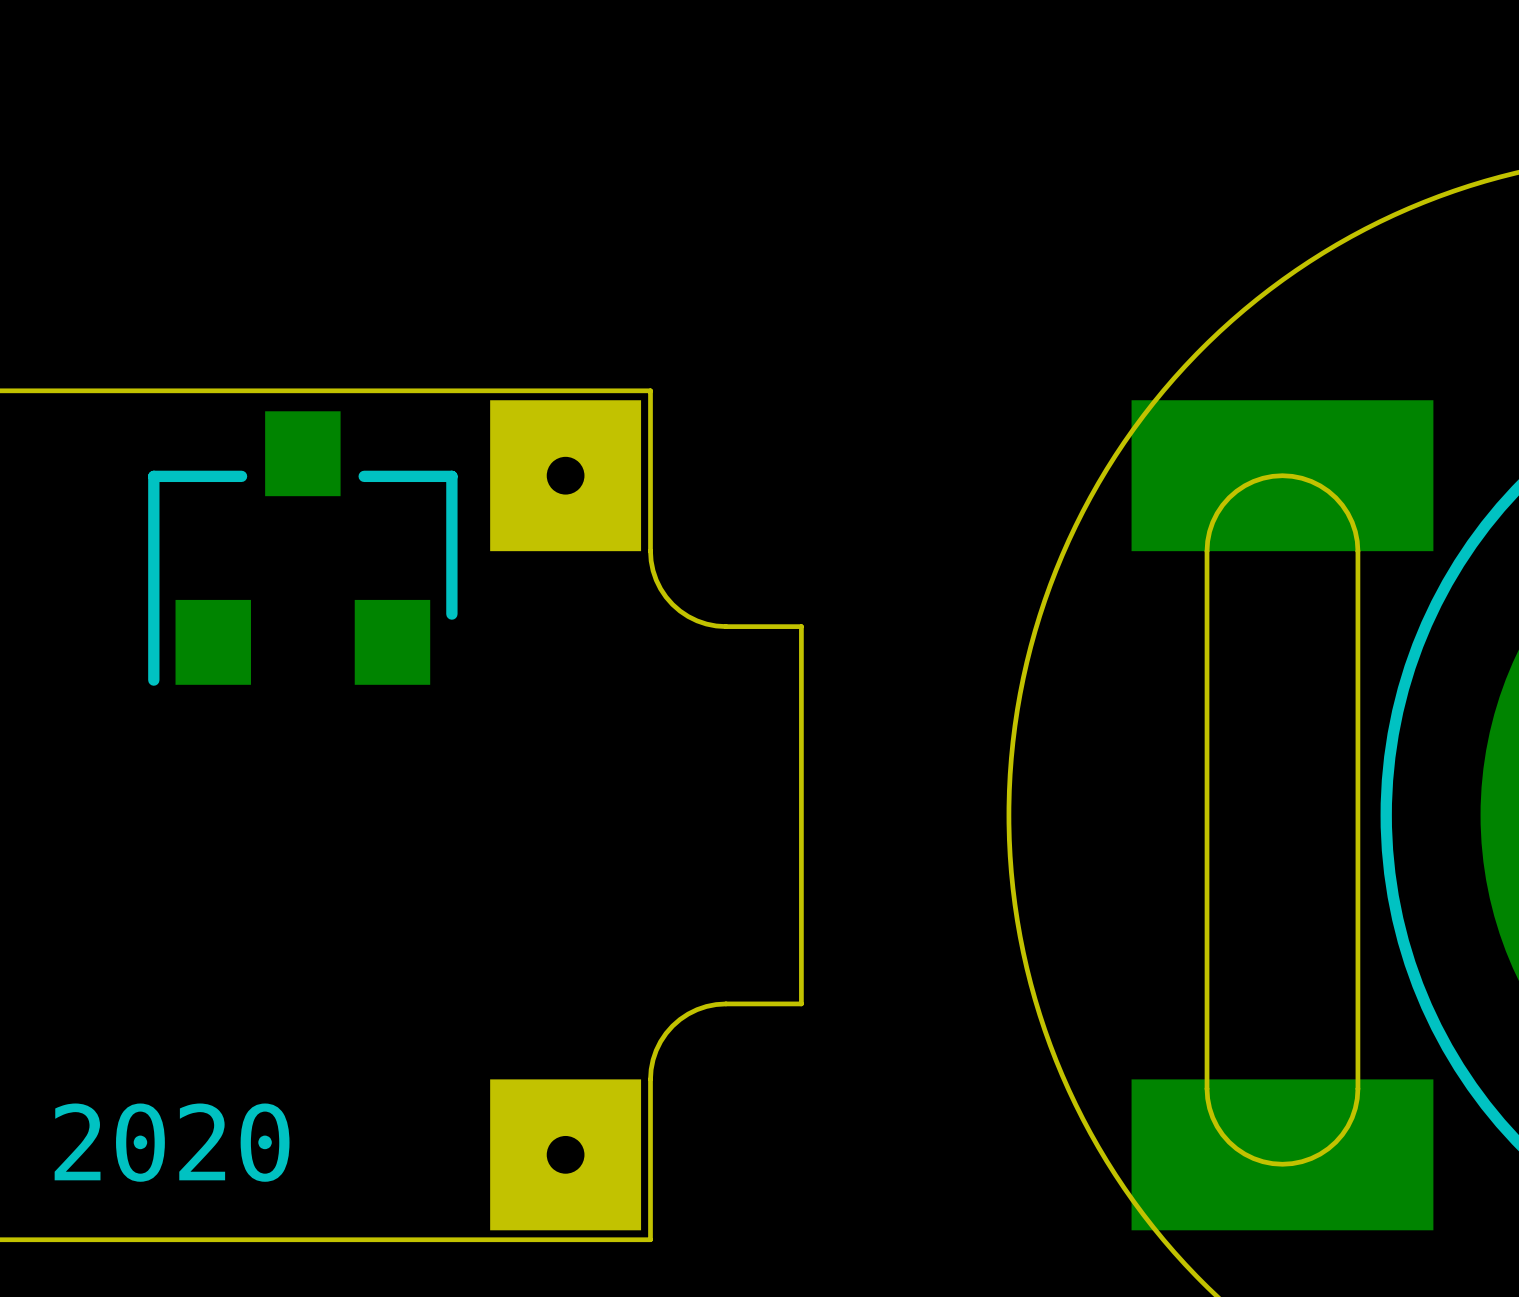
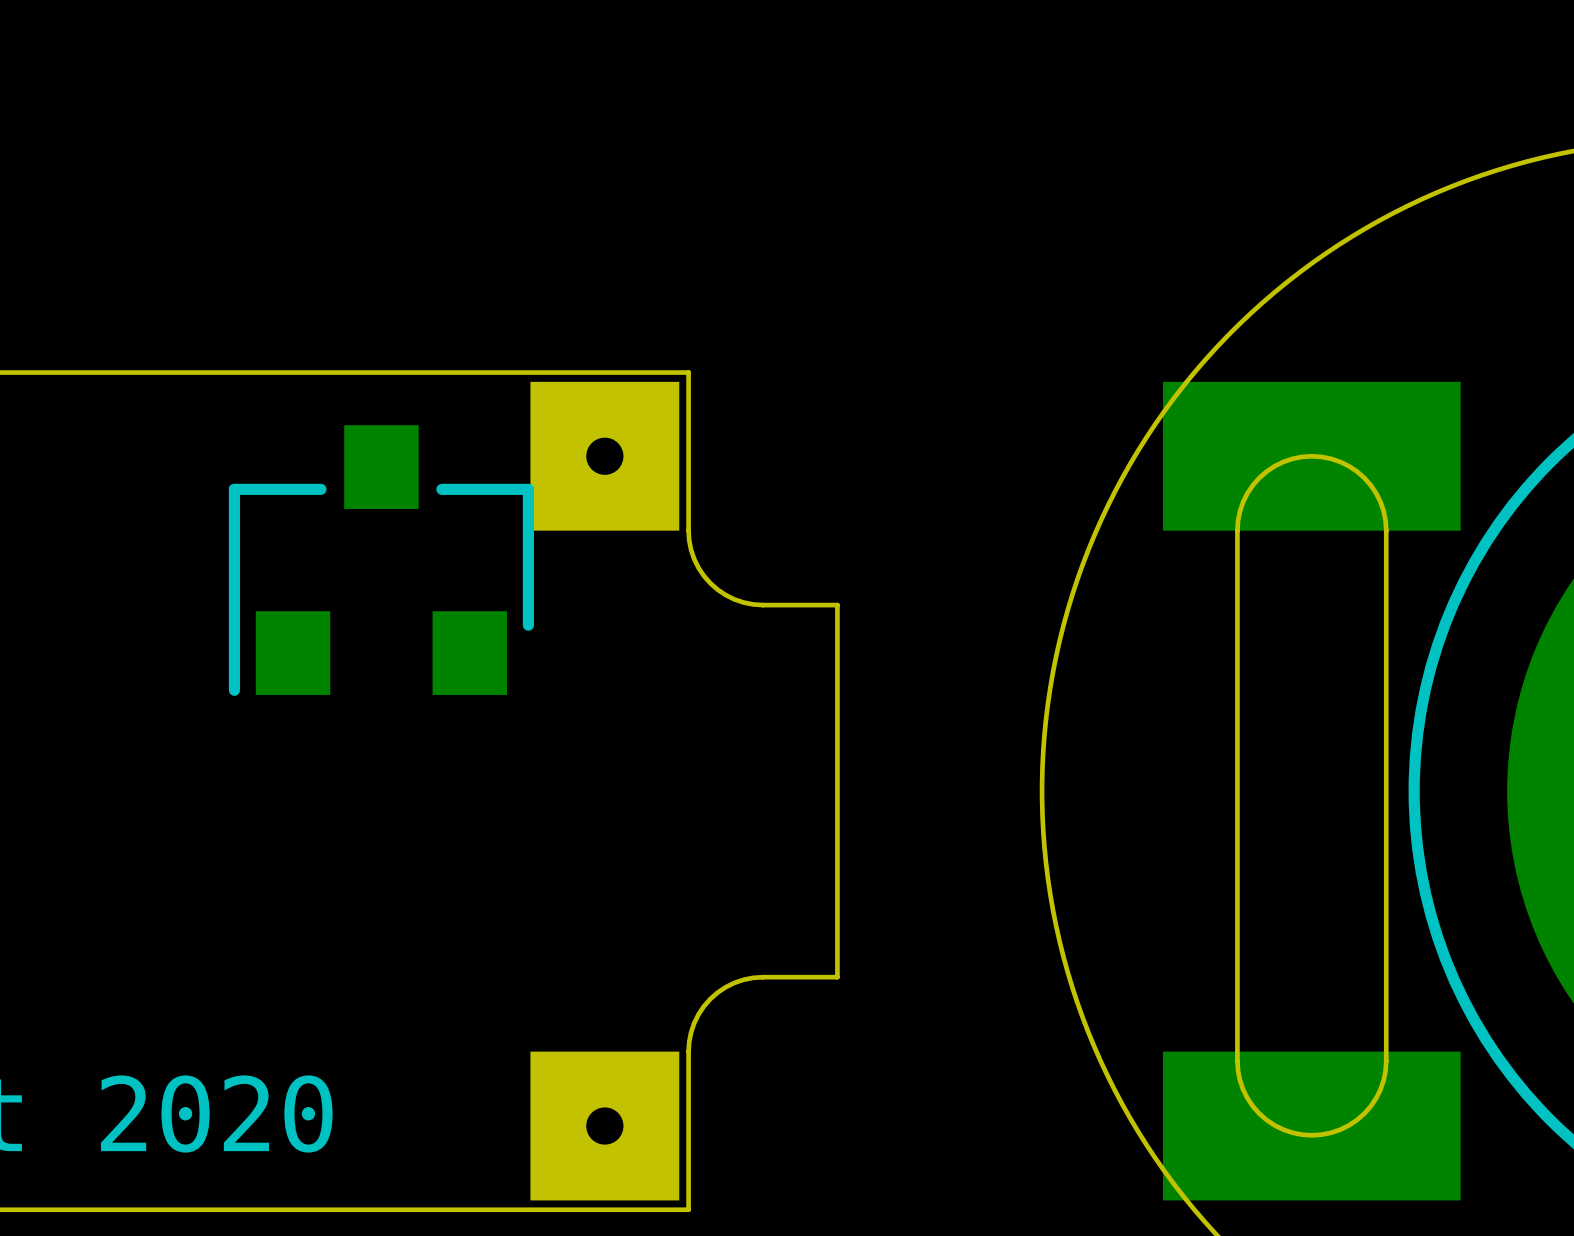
part position: (302, 548) -> (381, 560)

